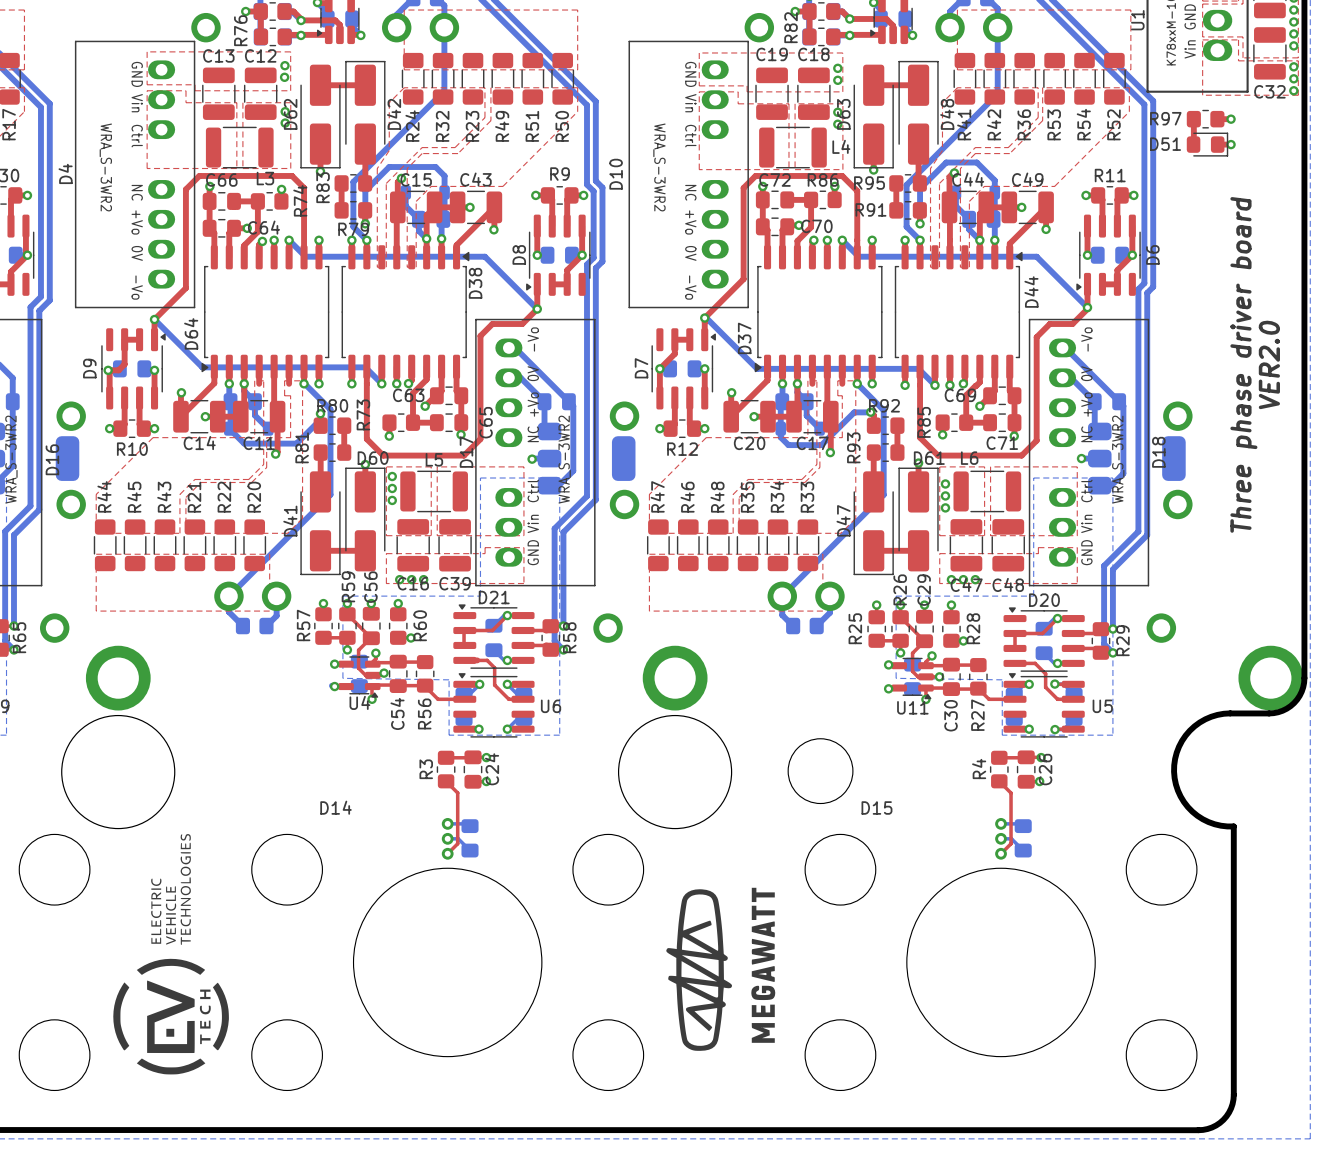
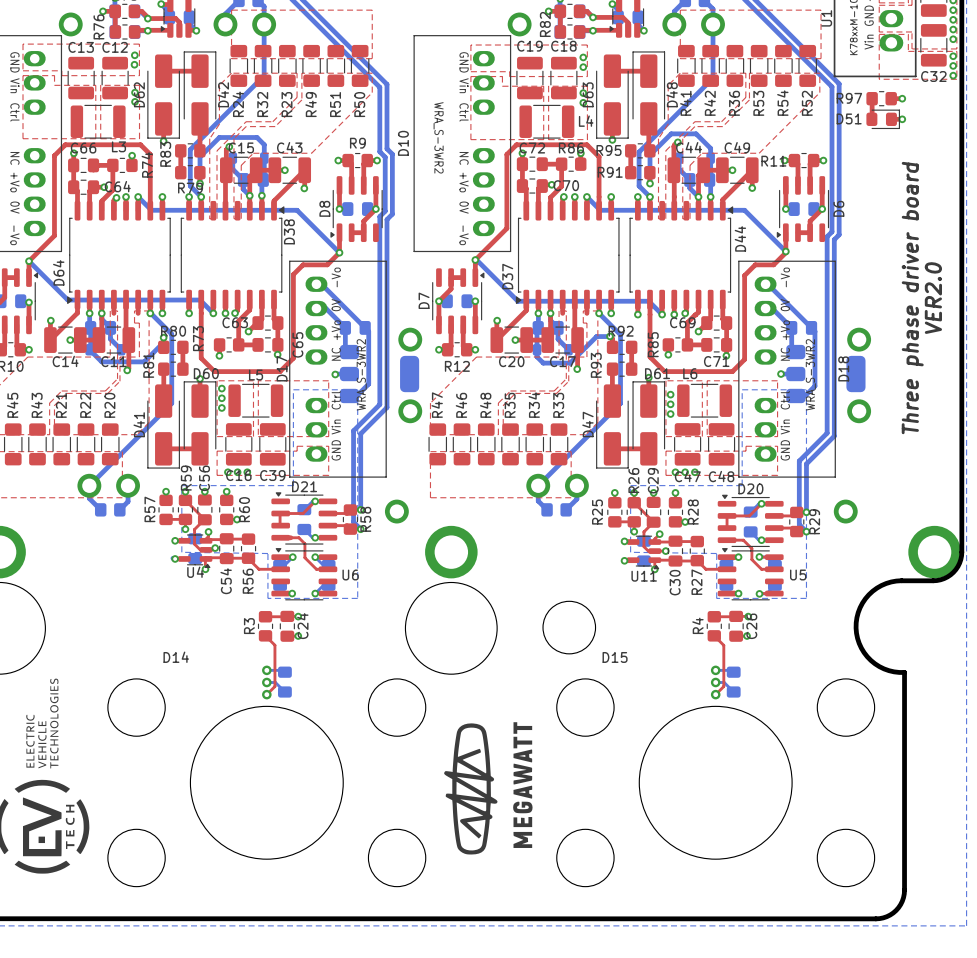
R11 name position: R11 (1110, 175) -> R11 (773, 161)

